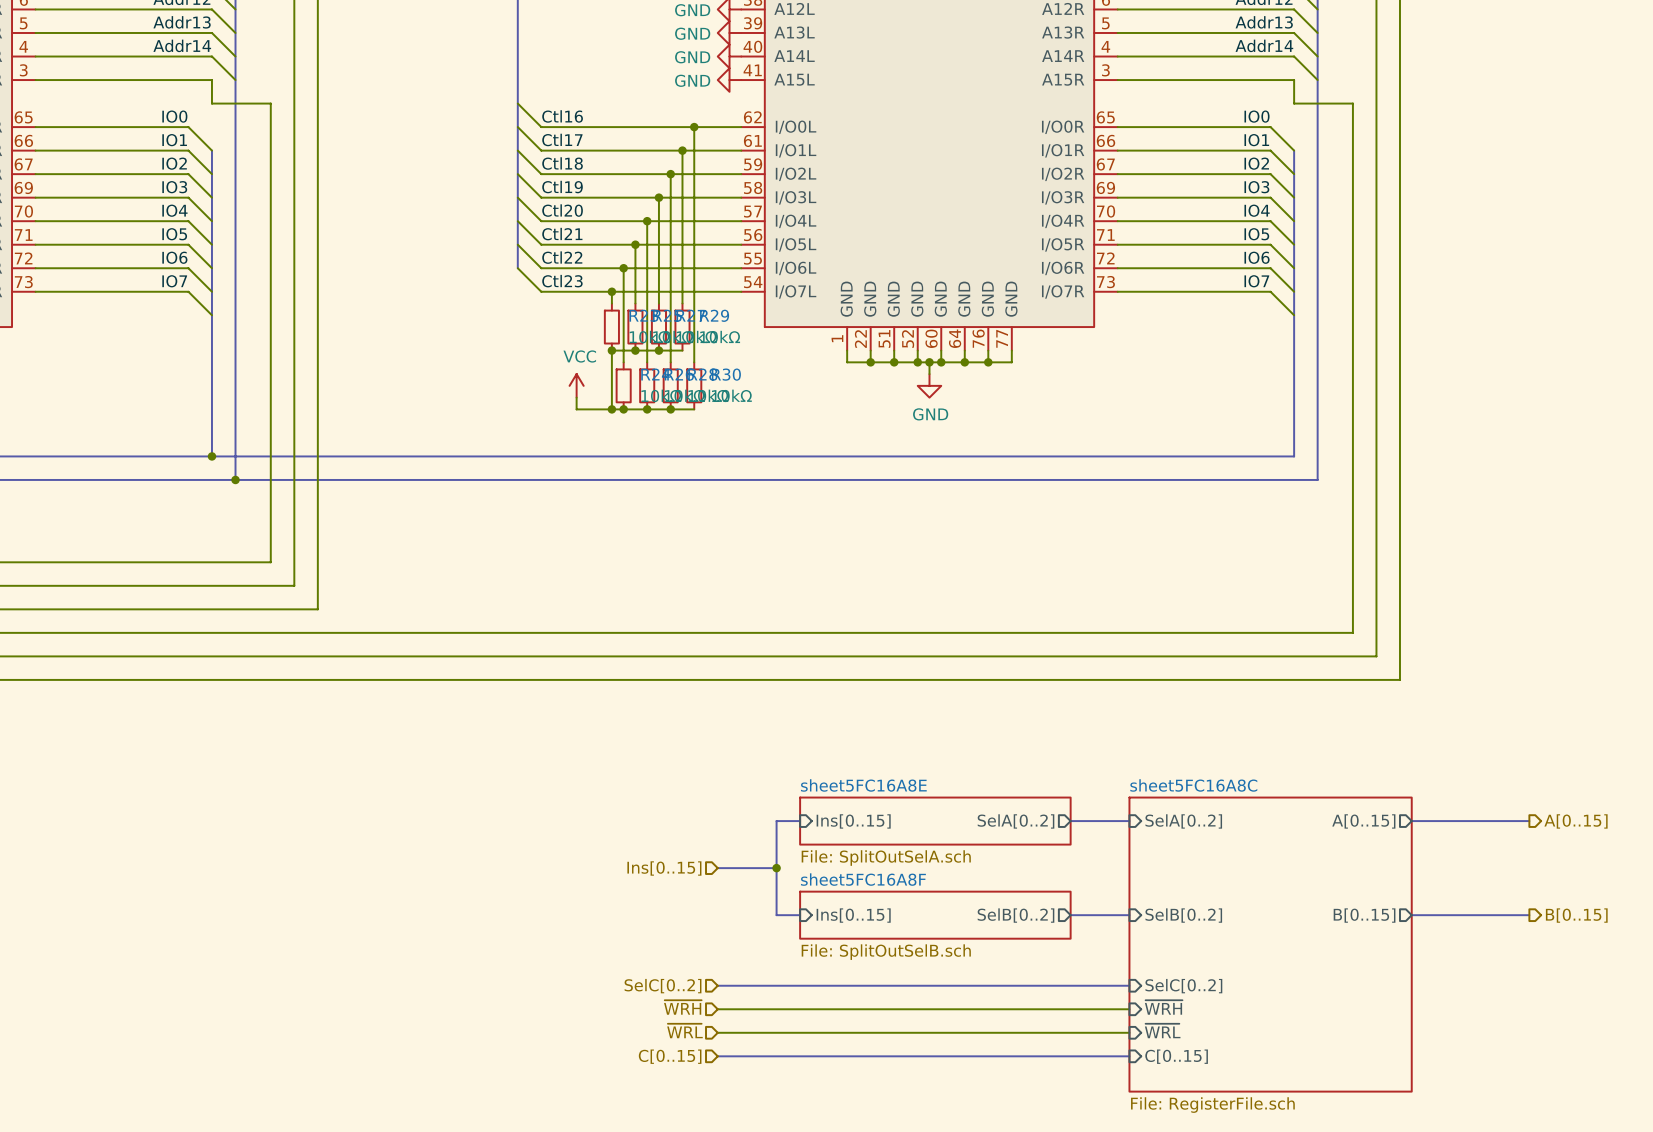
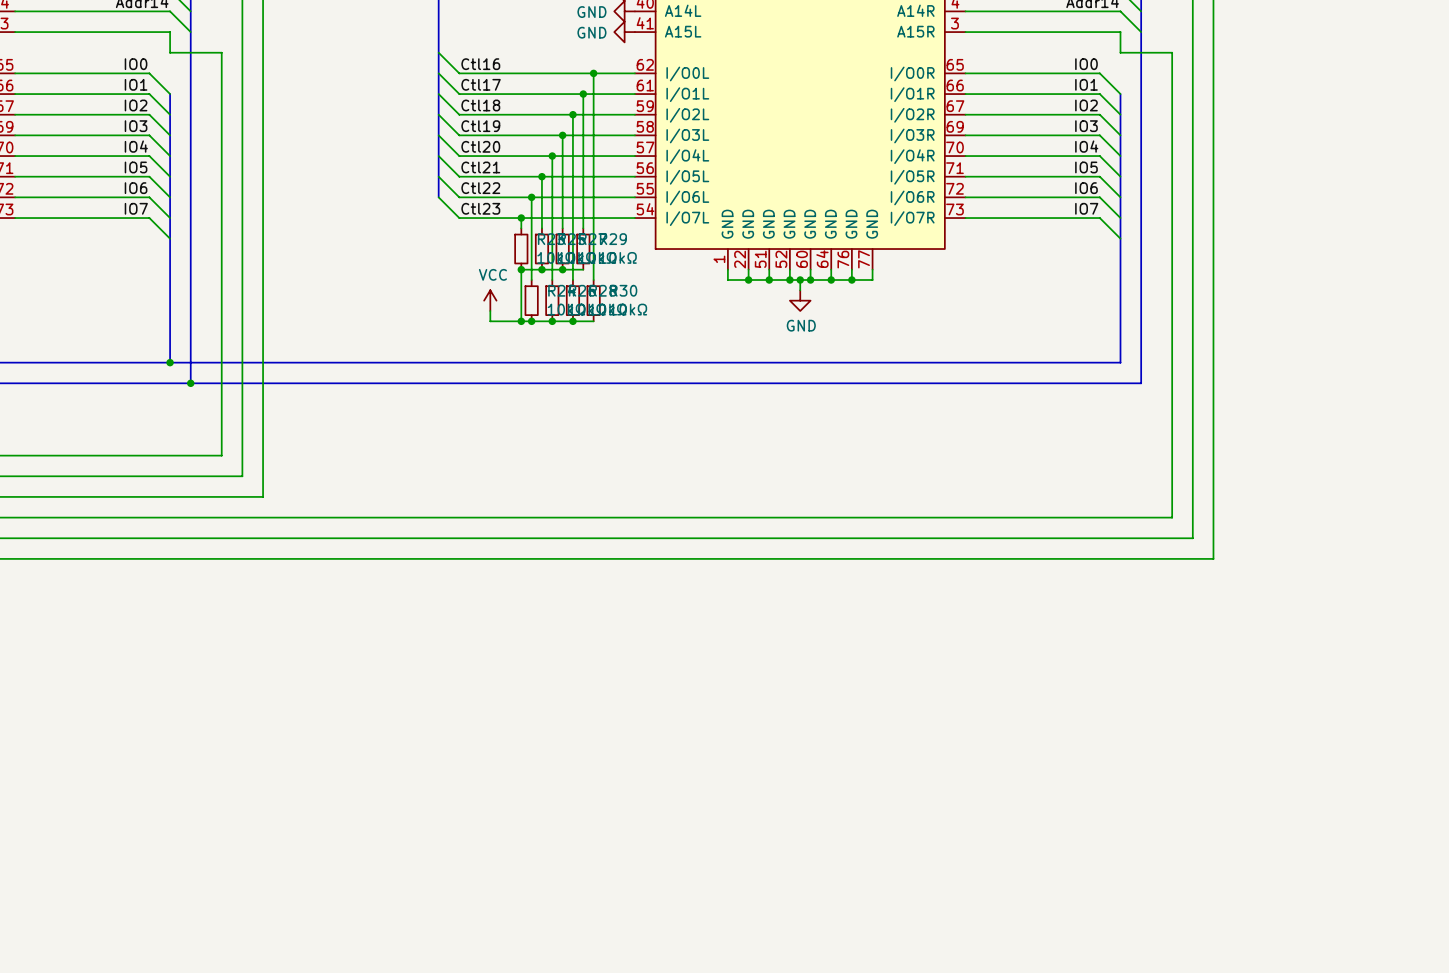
bus: (800, 821) (776, 821) (776, 915) (800, 915) -> none
sheet pin: Ins[0..15] (853, 821) -> none
sheet sheet5FC16A8E: File: SplitOutSelA.sch (935, 821) -> none
sheet pin: SelA[0..2] (1016, 821) -> none
bus: (1070, 821) (1129, 821) -> none
sheet pin: SelA[0..2] (1183, 821) -> none
sheet pin: A[0..15] (1363, 821) -> none
bus: (1411, 821) (1529, 821) -> none
hierarchical label: A[0..15] (1576, 821) -> none
hierarchical label: Ins[0..15] (664, 868) -> none
bus: (717, 868) (776, 868) -> none
junction: (776, 868) -> none
sheet pin: Ins[0..15] (853, 915) -> none
sheet sheet5FC16A8F: File: SplitOutSelB.sch (935, 915) -> none
sheet pin: SelB[0..2] (1015, 915) -> none
bus: (1070, 915) (1129, 915) -> none
sheet pin: SelB[0..2] (1183, 915) -> none
sheet pin: B[0..15] (1364, 915) -> none
bus: (1411, 915) (1529, 915) -> none
hierarchical label: B[0..15] (1576, 915) -> none
sheet sheet5FC16A8C: File: RegisterFile.sch (1270, 944) -> none
bus: (717, 985) (1129, 985) -> none
hierarchical label: SelC[0..2] (663, 986) -> none
sheet pin: SelC[0..2] (1183, 986) -> none
hierarchical label: ~{WRH} (682, 1007) -> none
sheet pin: ~{WRH} (1163, 1007) -> none
wire: (717, 1009) (1129, 1009) -> none
hierarchical label: ~{WRL} (684, 1031) -> none
sheet pin: ~{WRL} (1162, 1031) -> none
wire: (717, 1032) (1129, 1032) -> none
hierarchical label: C[0..15] (670, 1056) -> none
bus: (717, 1056) (1129, 1056) -> none
sheet pin: C[0..15] (1176, 1056) -> none

